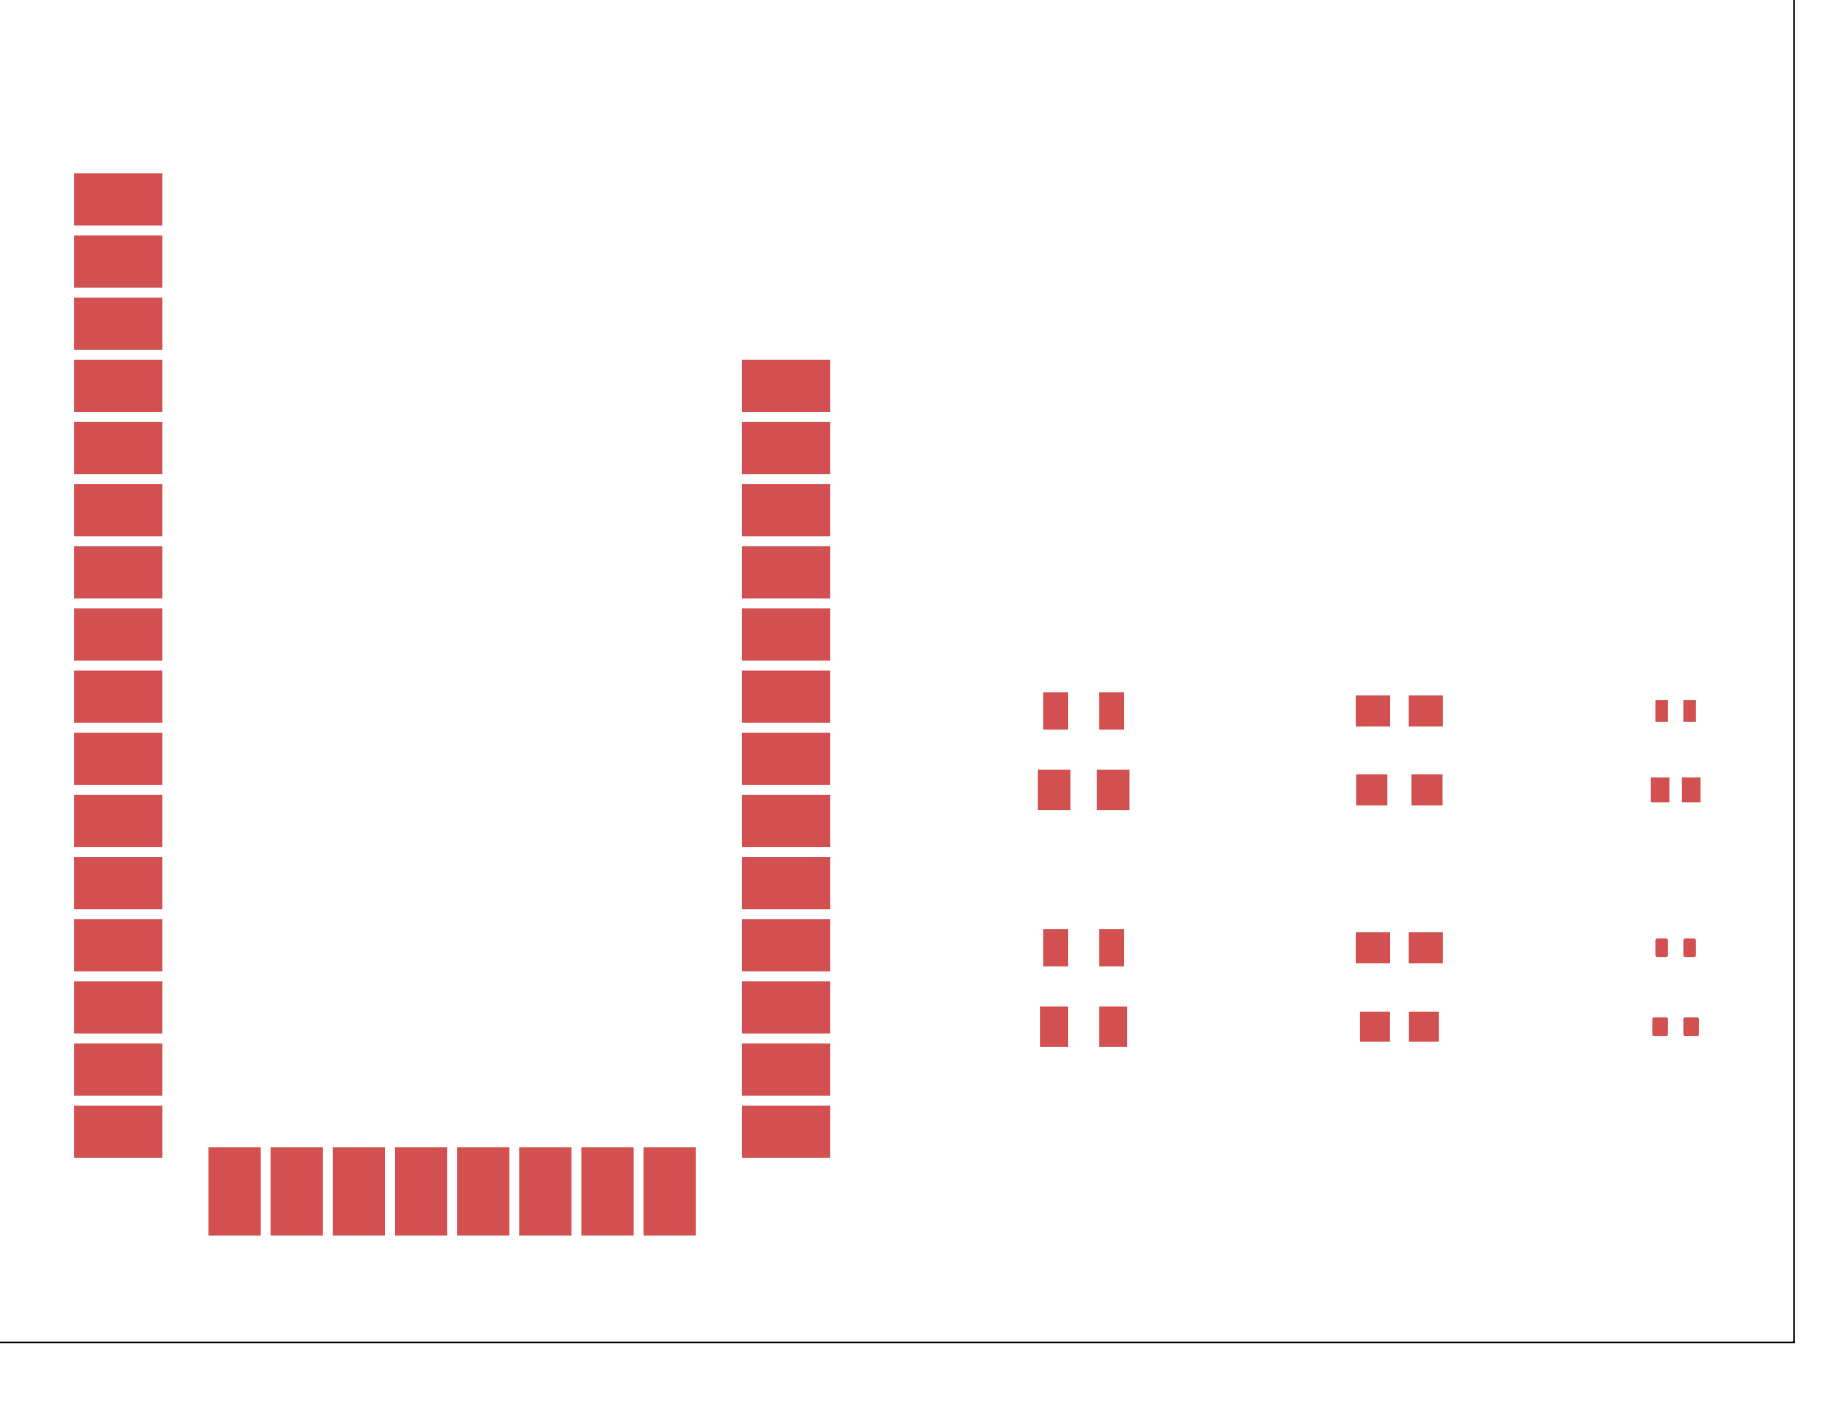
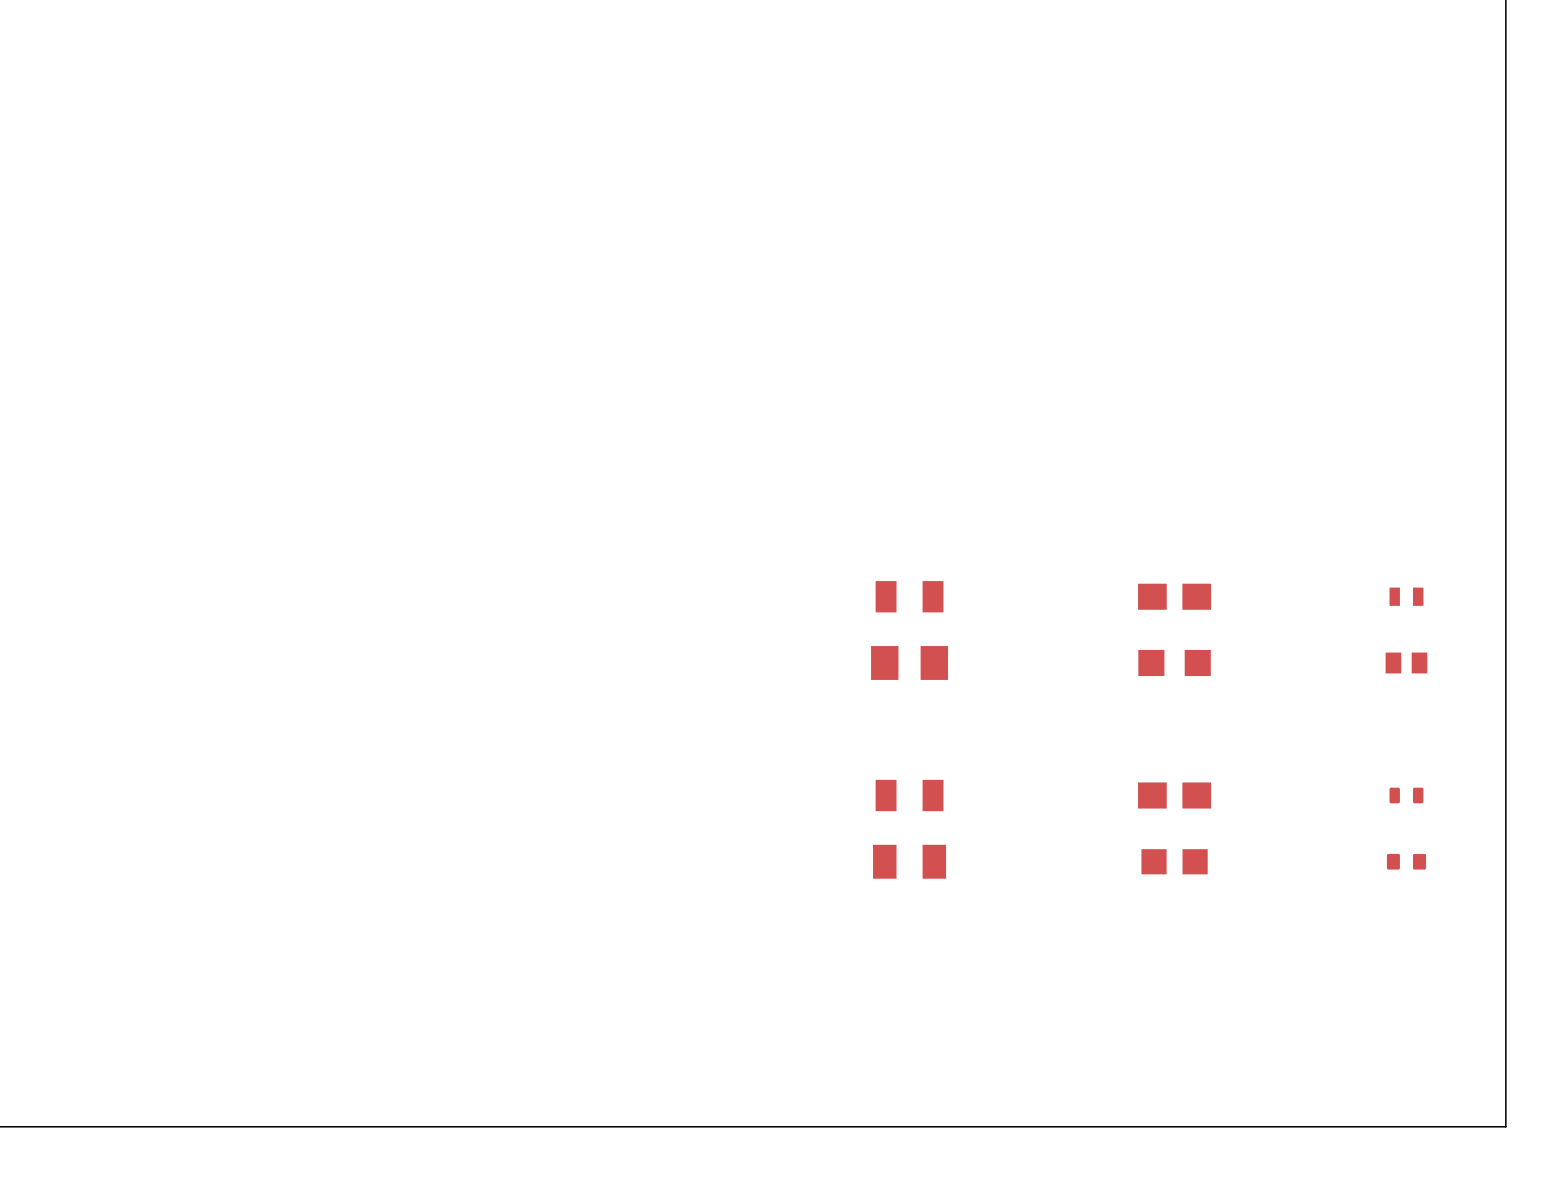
part: (452, 704) -> none

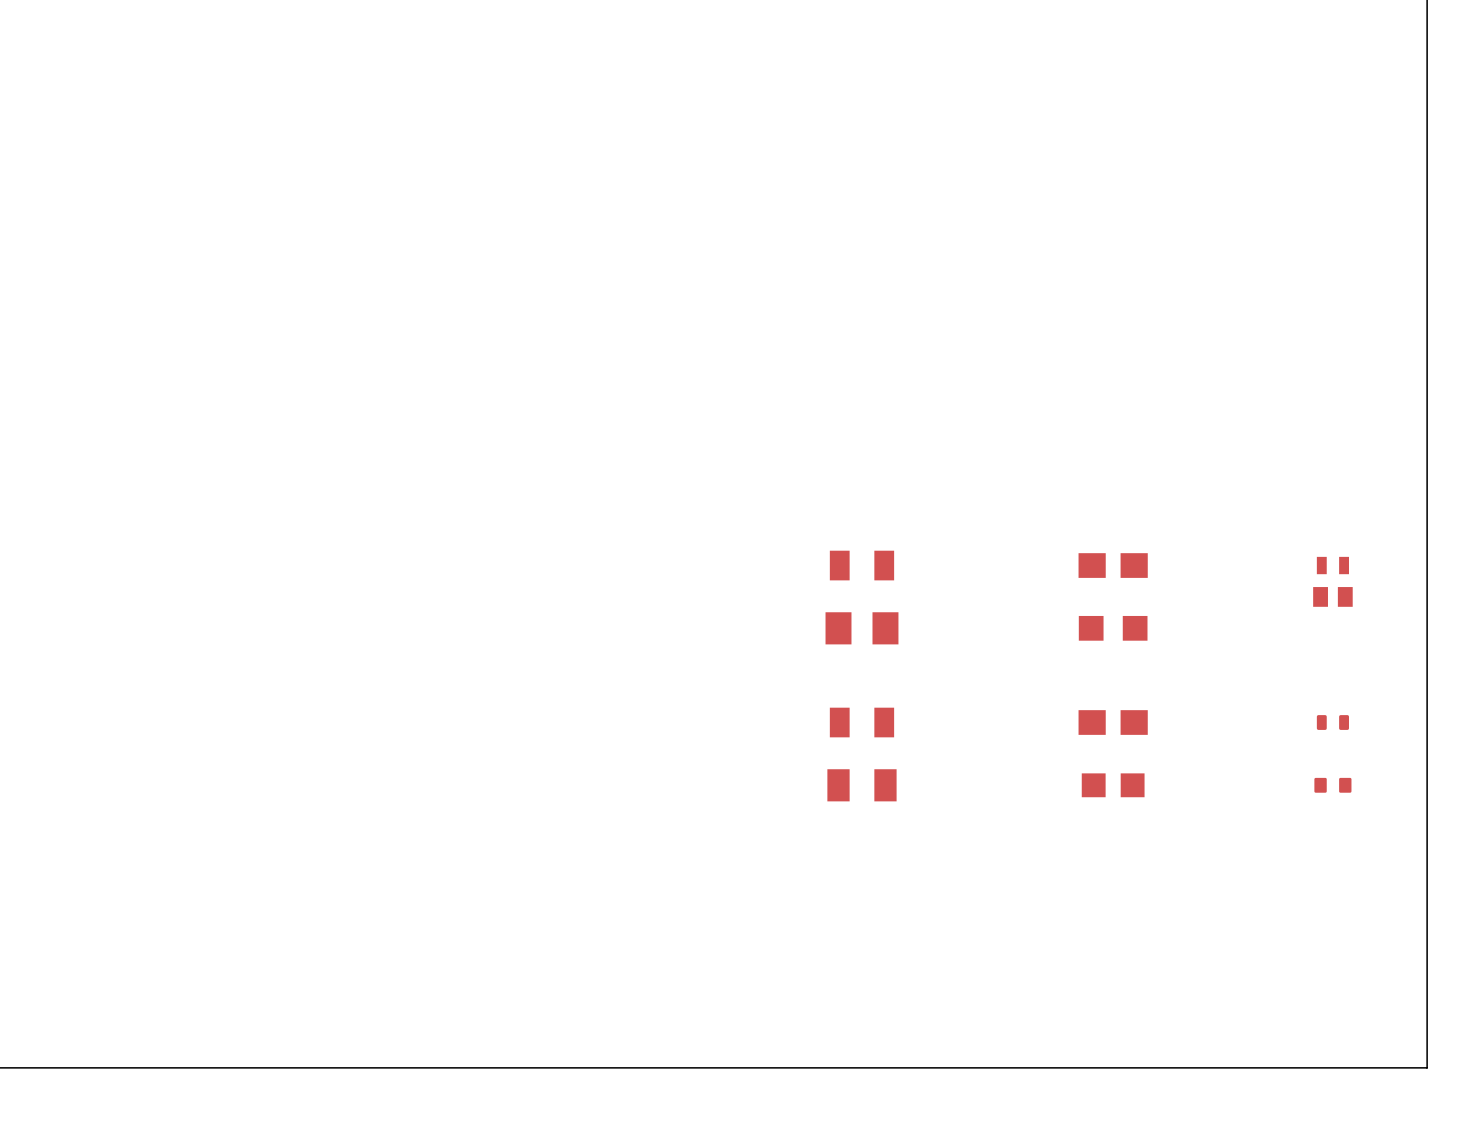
part position: (1406, 662) -> (1332, 596)
part position: (909, 795) -> (861, 722)
part position: (1174, 795) -> (1113, 722)
part position: (1406, 795) -> (1332, 722)
part position: (909, 861) -> (861, 785)
part position: (1174, 861) -> (1113, 785)
part position: (1406, 861) -> (1332, 785)

